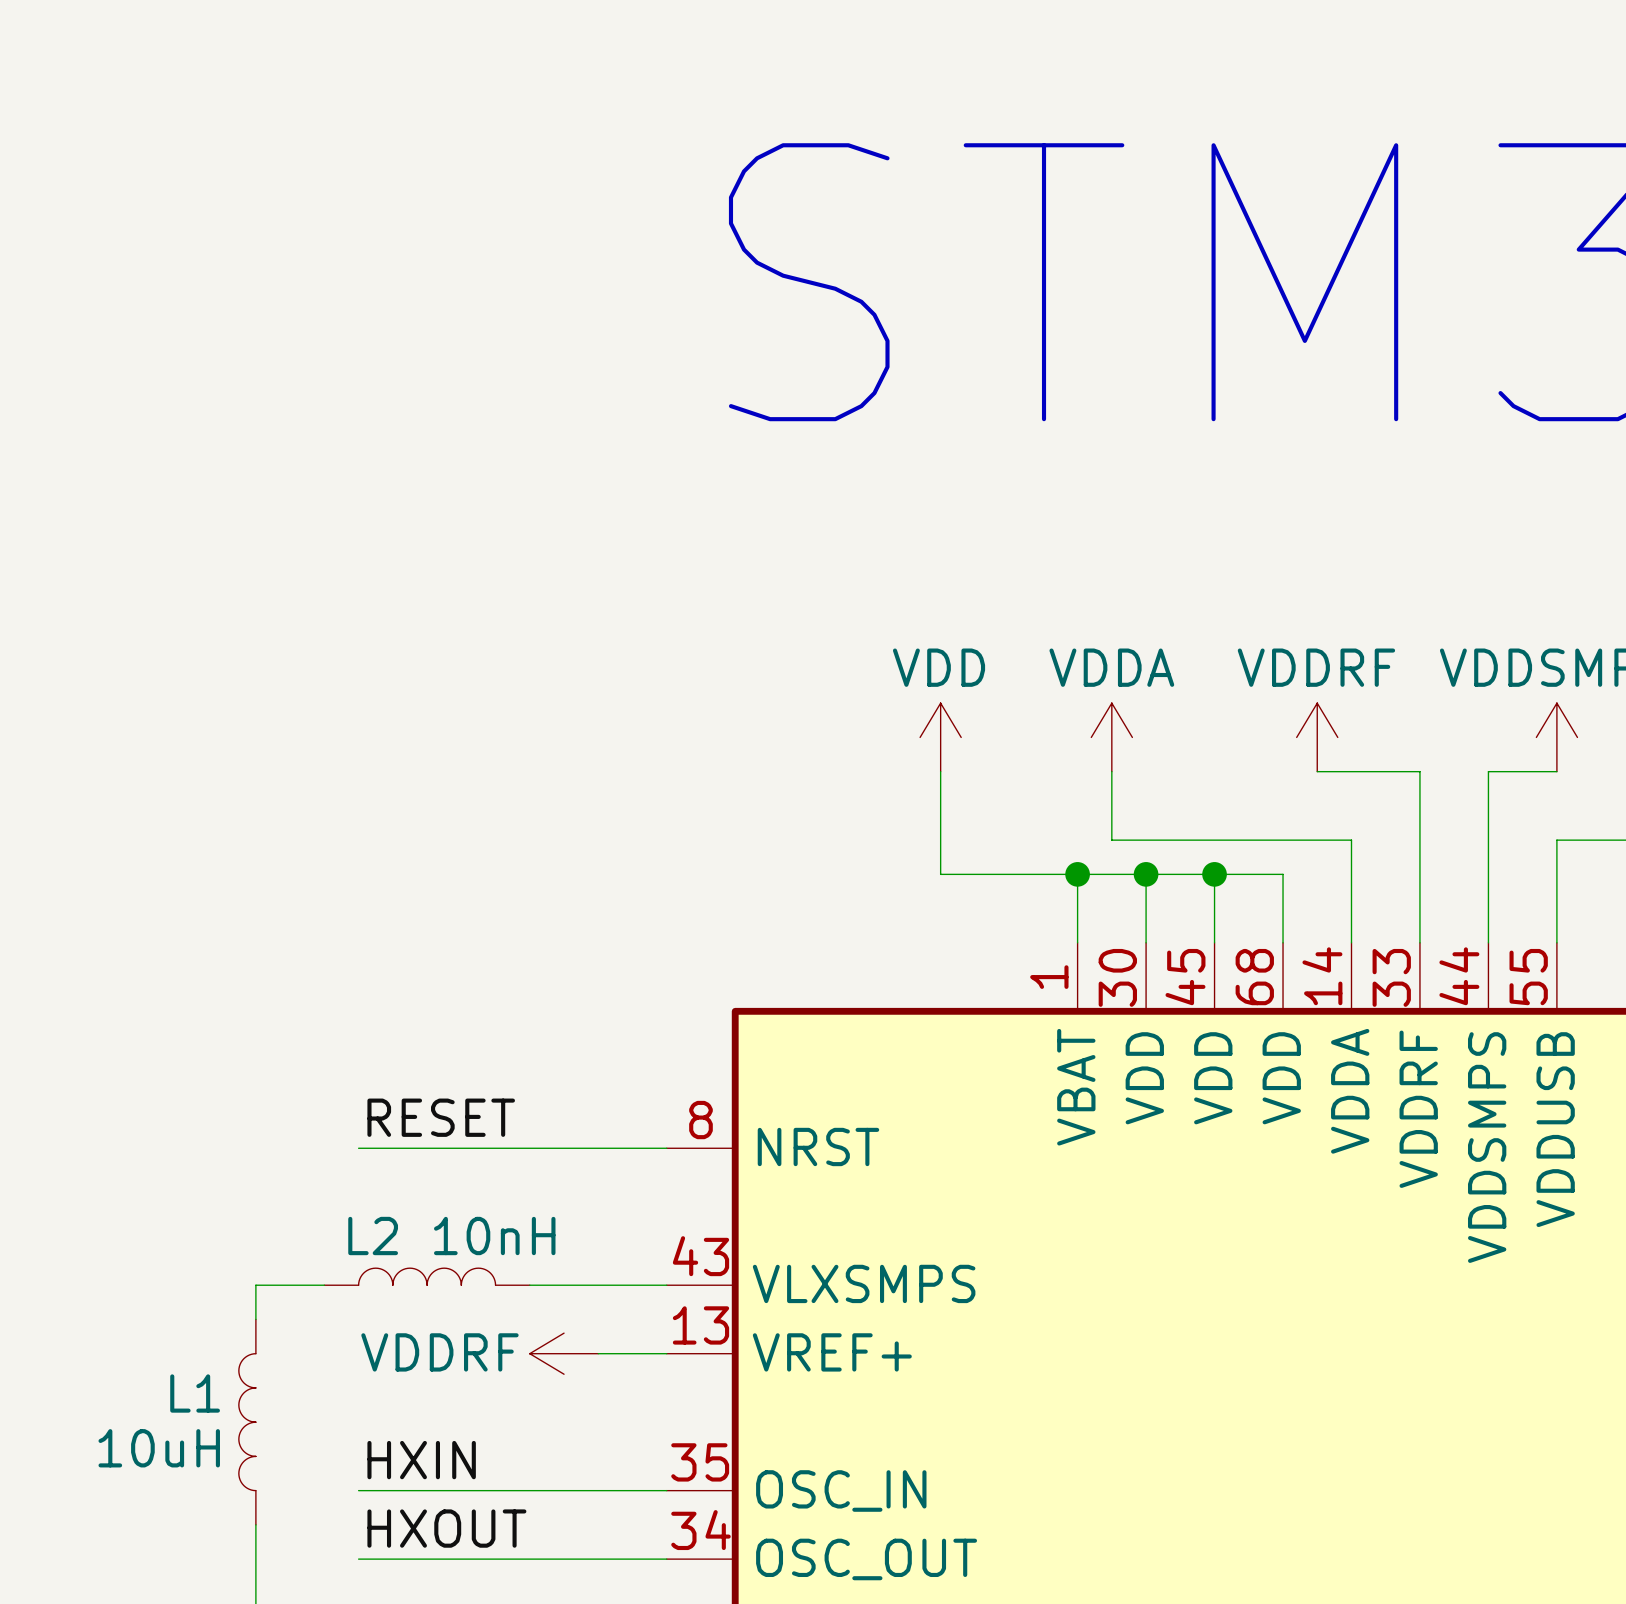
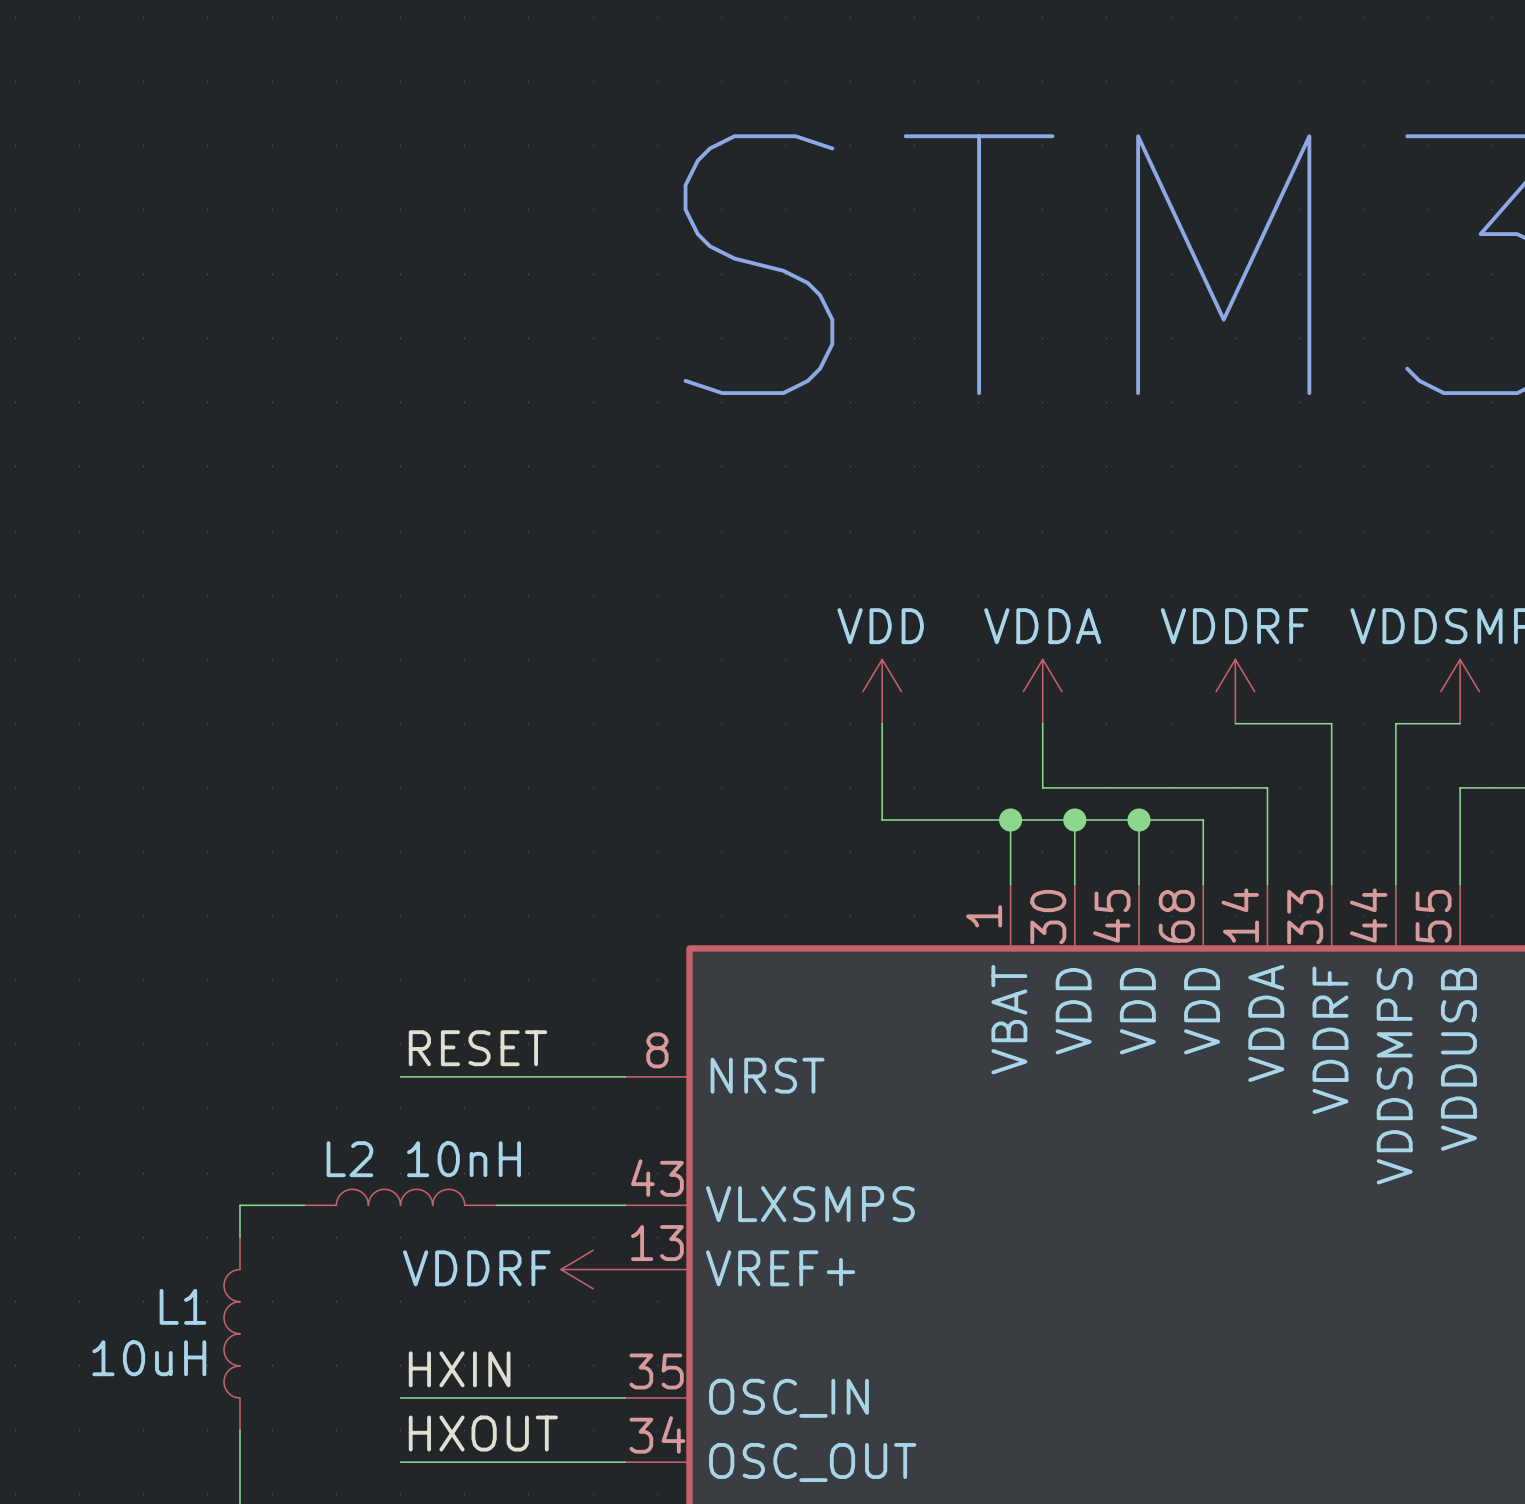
label position: RESET (441, 1117) -> RESET (477, 1048)
wire: (358, 1148) (427, 1148) -> none
power symbol position: VDDRF (564, 1353) -> VDDRF (593, 1269)
label position: HXIN (421, 1460) -> HXIN (459, 1369)
wire: (358, 1490) (427, 1490) -> none
label position: HXOUT (446, 1528) -> HXOUT (483, 1433)
wire: (358, 1559) (427, 1559) -> none

